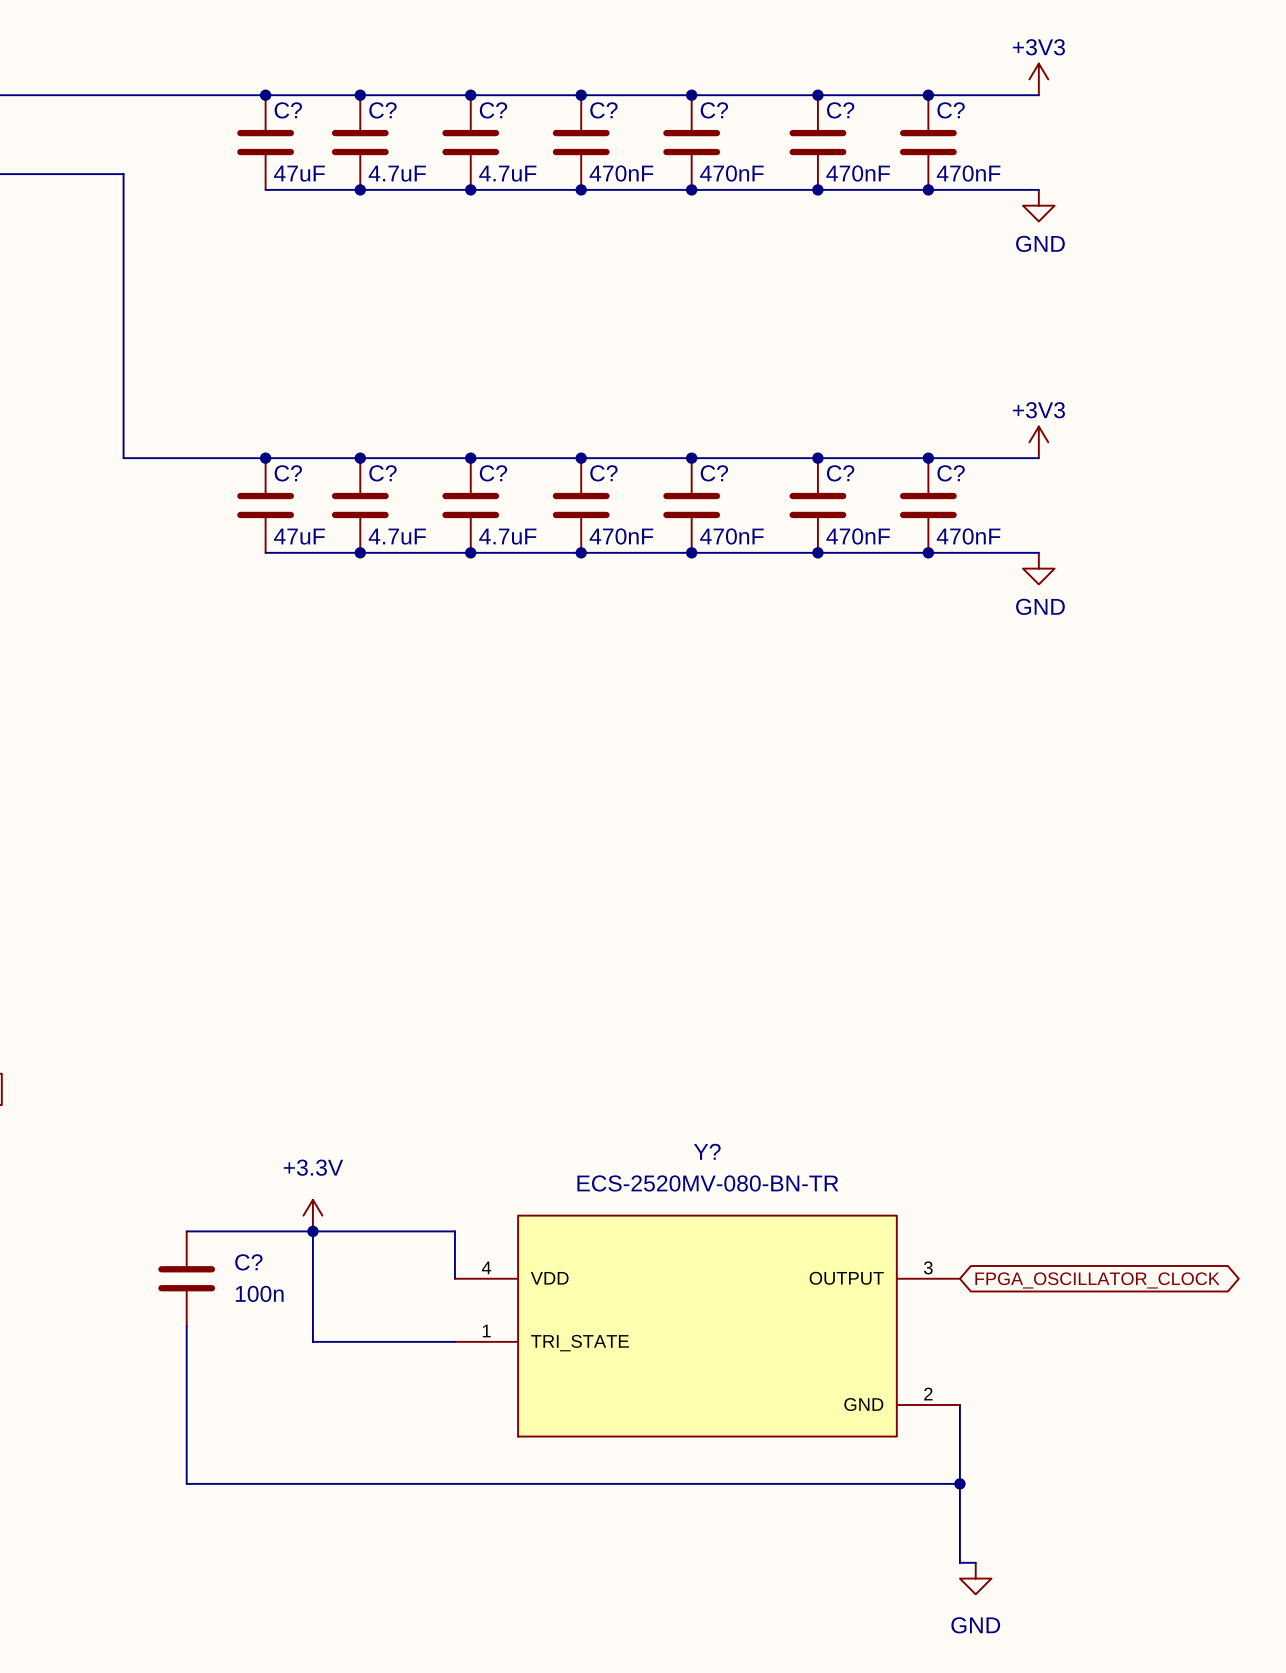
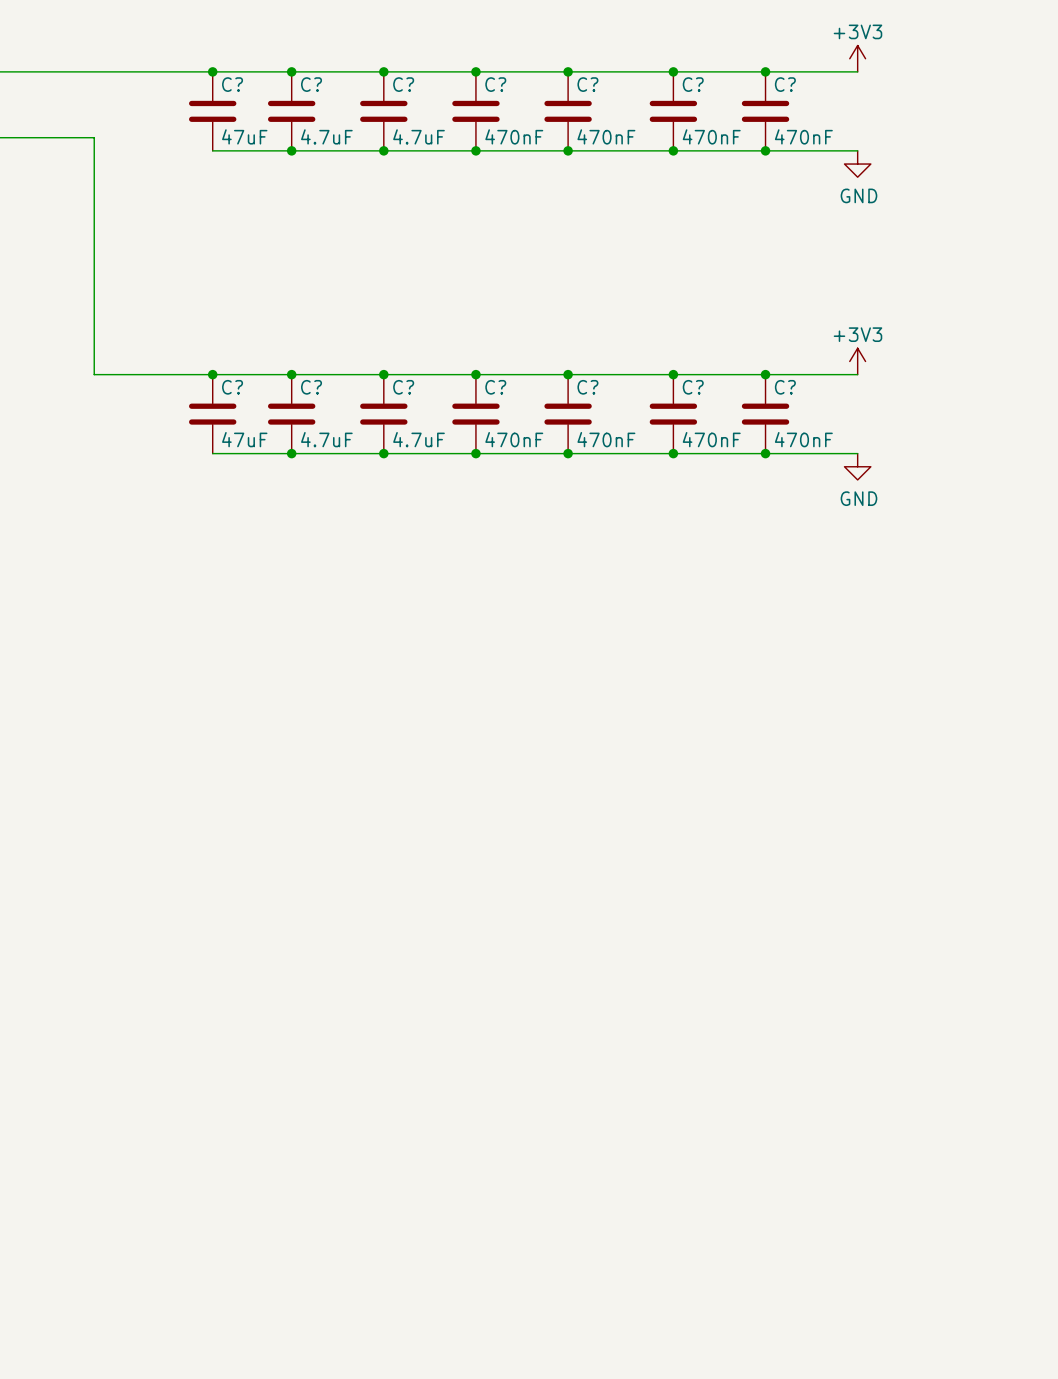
power symbol: +3.3V (312, 1215) -> none
wire: (186, 1231) (454, 1231) (454, 1278) -> none
wire: (312, 1231) (312, 1341) (454, 1341) -> none
junction: (312, 1231) -> none
C?: 100n (186, 1278) -> none
global label: FPGA_OSCILLATOR_CLOCK (1097, 1280) -> none
wire: (186, 1326) (186, 1483) (959, 1483) -> none
Y?: ECS-2520MV-080-BN-TR (707, 1326) -> none
wire: (959, 1404) (959, 1562) (975, 1562) -> none
junction: (959, 1483) -> none
power symbol: GND (975, 1578) -> none

